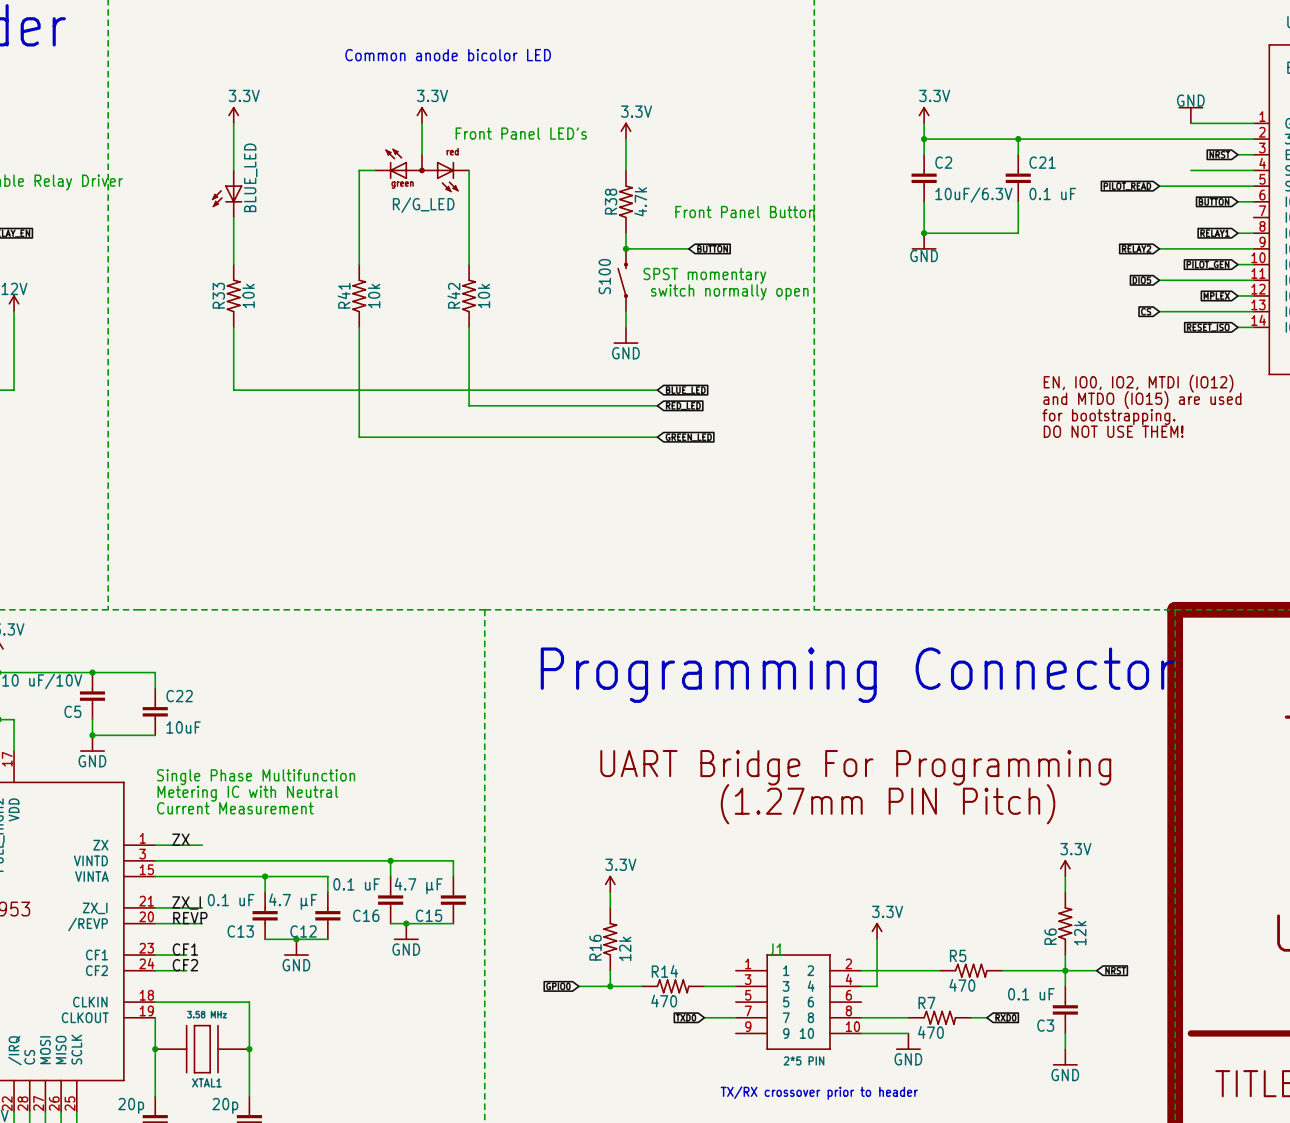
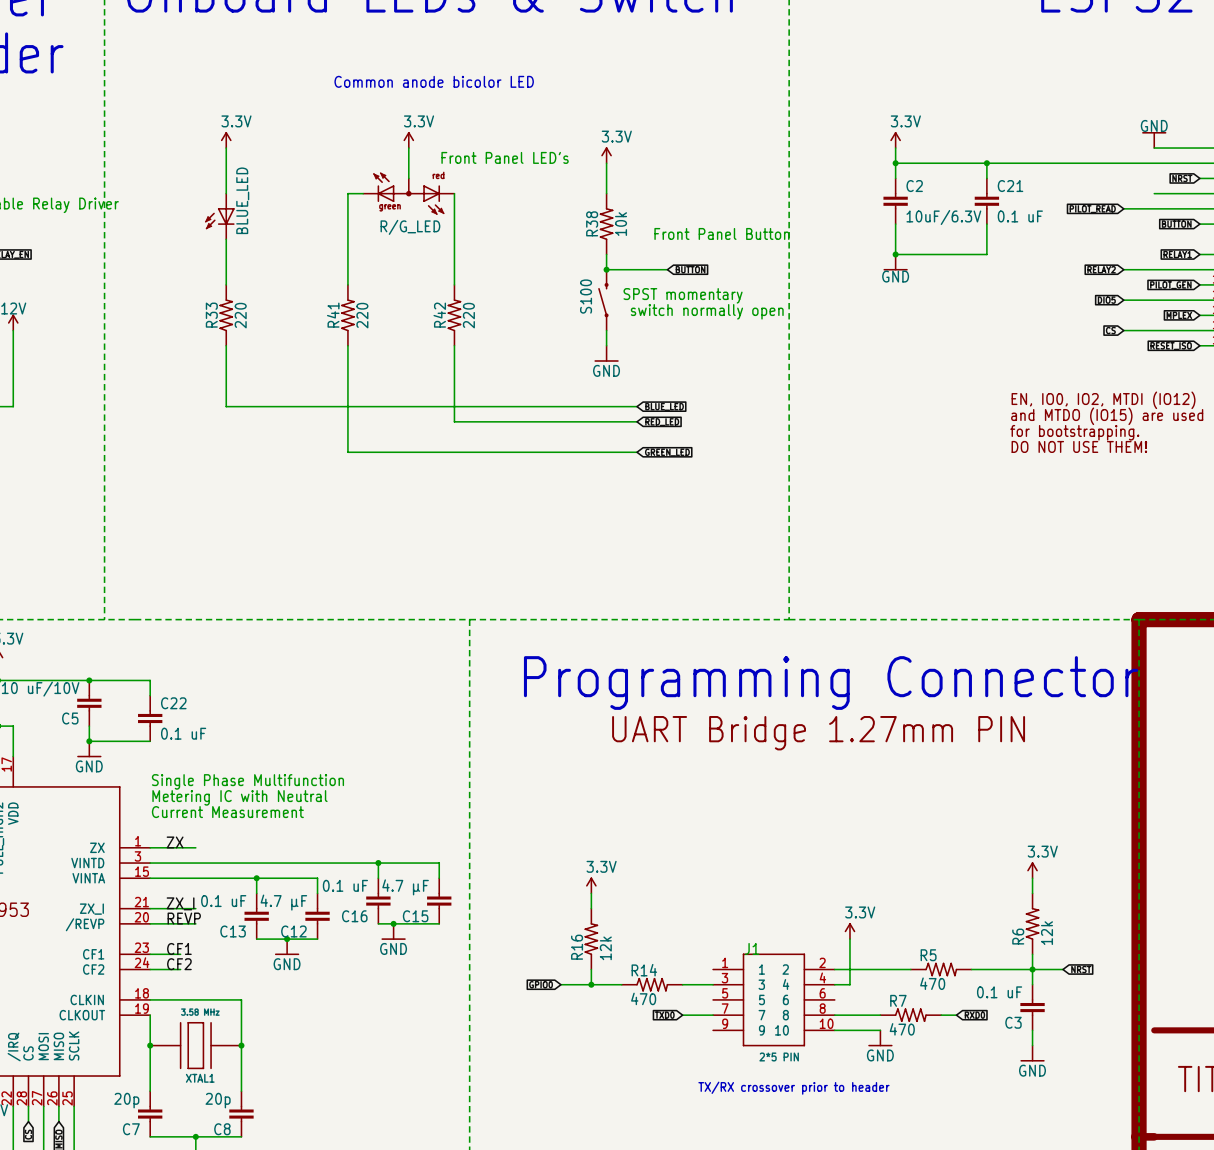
R38 value: 4.7k (640, 201) -> 10k (621, 224)
R33 value: 10k (248, 295) -> 220 (240, 315)
R41 value: 10k (374, 295) -> 220 (362, 315)
R42 value: 10k (483, 295) -> 220 (468, 315)
text: none -> UART Bridge 1.27mm PIN (818, 733)
C22 value: 10uF (183, 727) -> 0.1 uF (183, 733)
text: UART Bridge For Programming (855, 767) -> none
text: (1.27mm PIN Pitch) (888, 804) -> none

